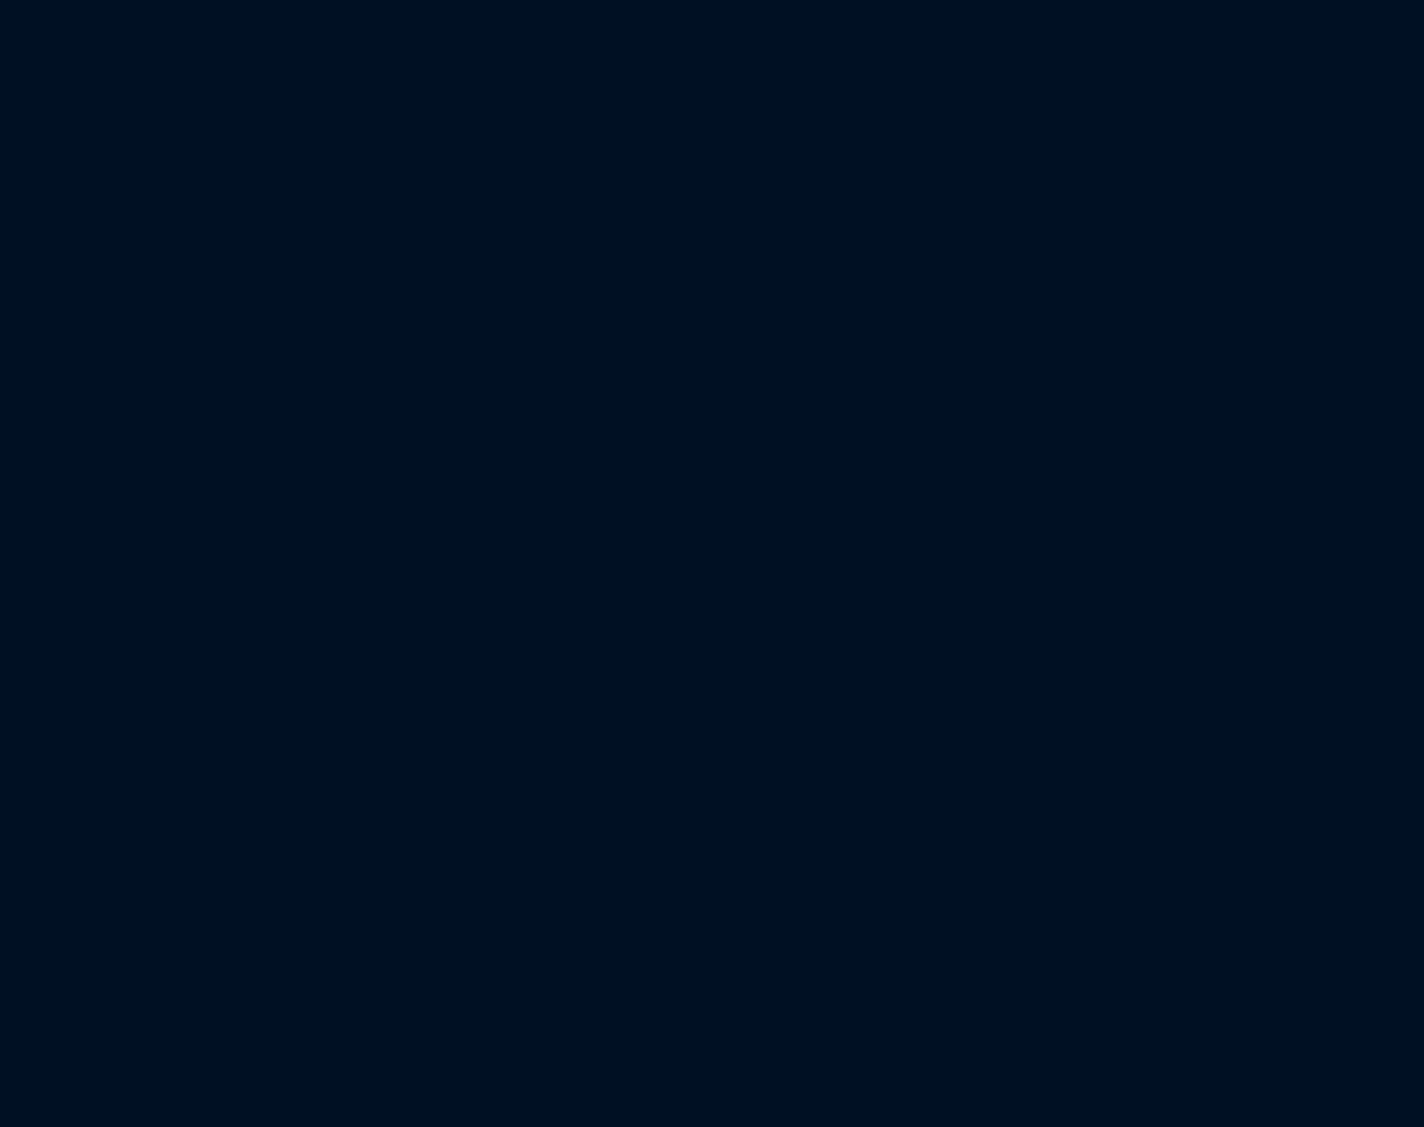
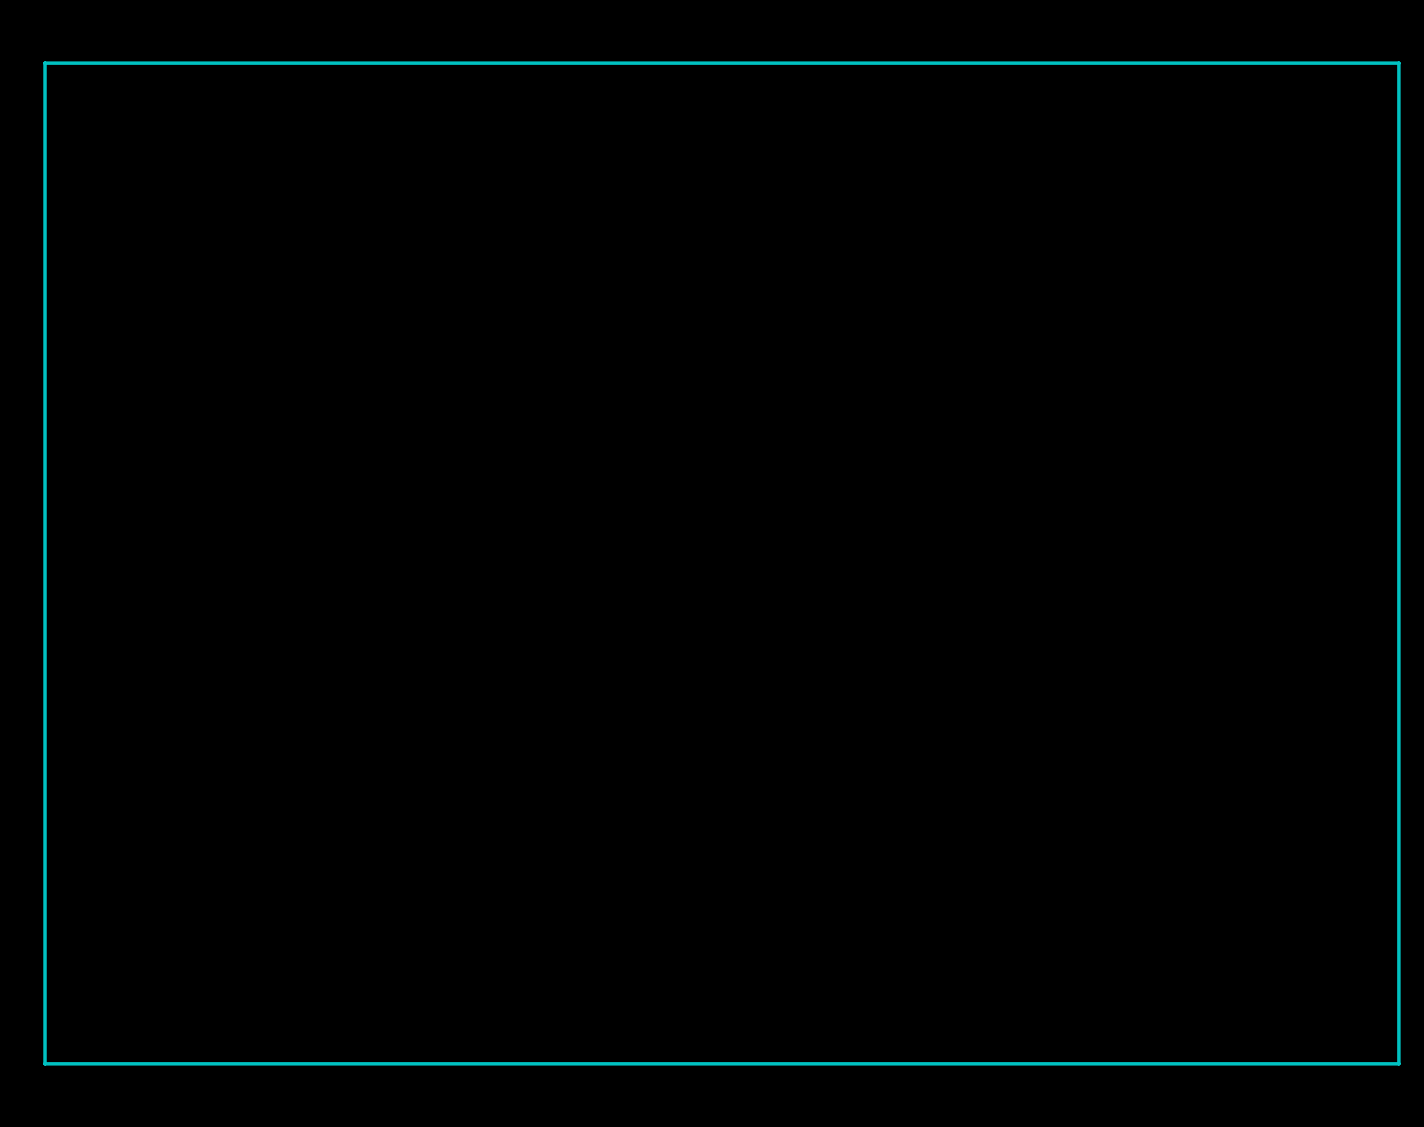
line: none -> (45, 63) (45, 1063) (1398, 1063) (1398, 63) (45, 63)

